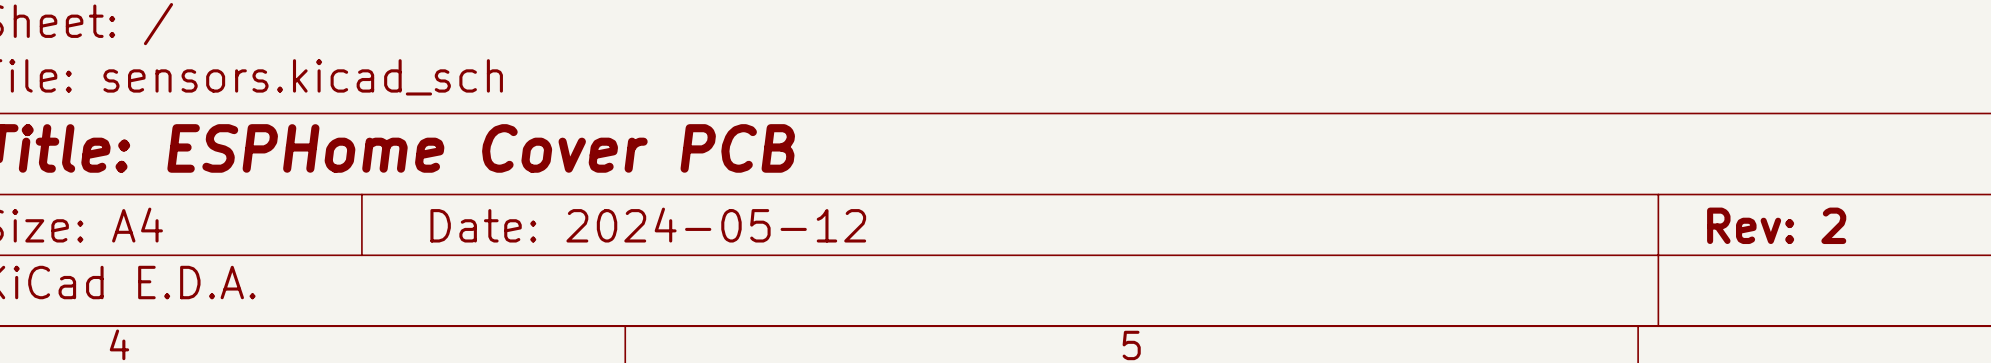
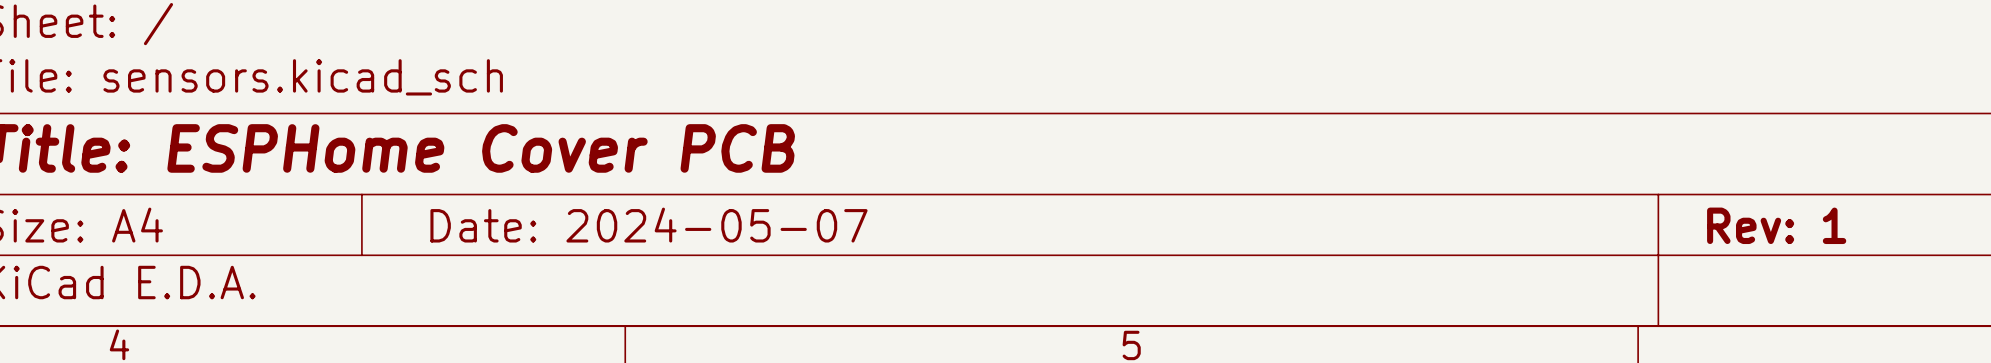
title block: Date: 2024-05-12 (648, 225) -> Date: 2024-05-07 (648, 225)
title block: Rev: 2 (1776, 225) -> Rev: 1 (1776, 225)

